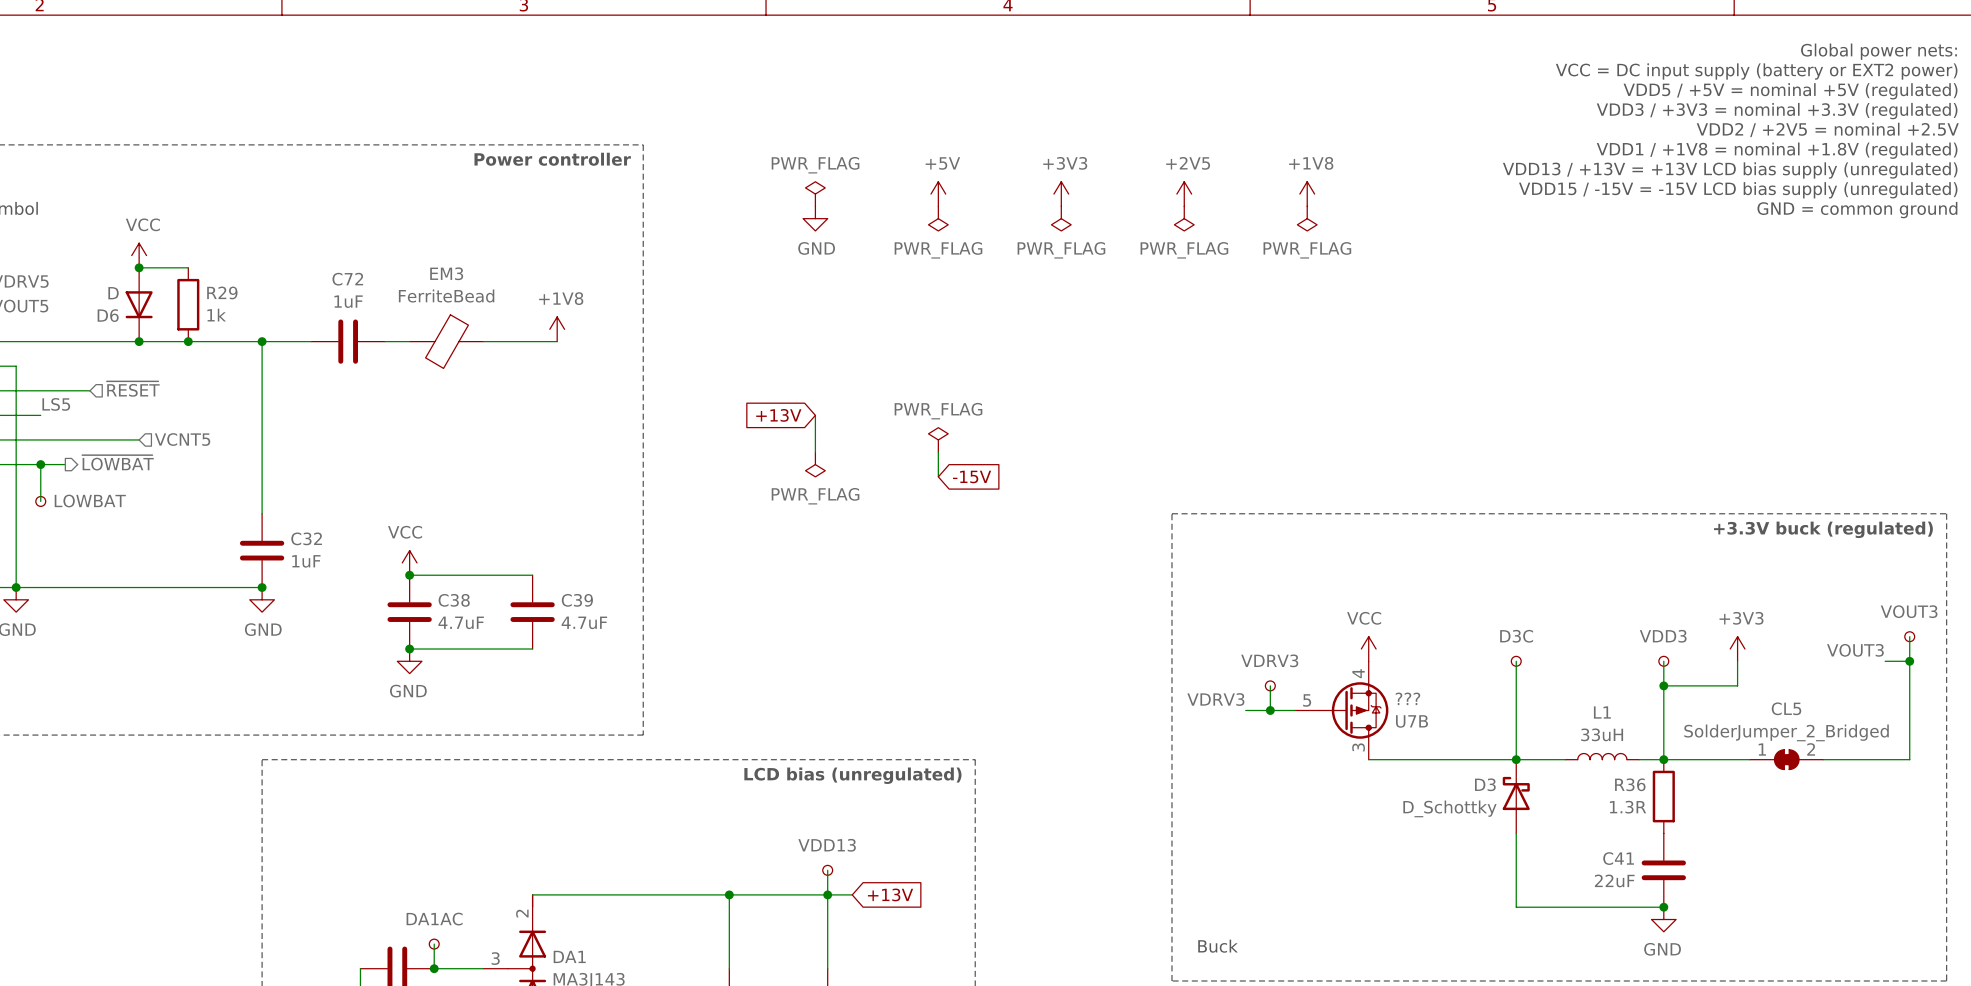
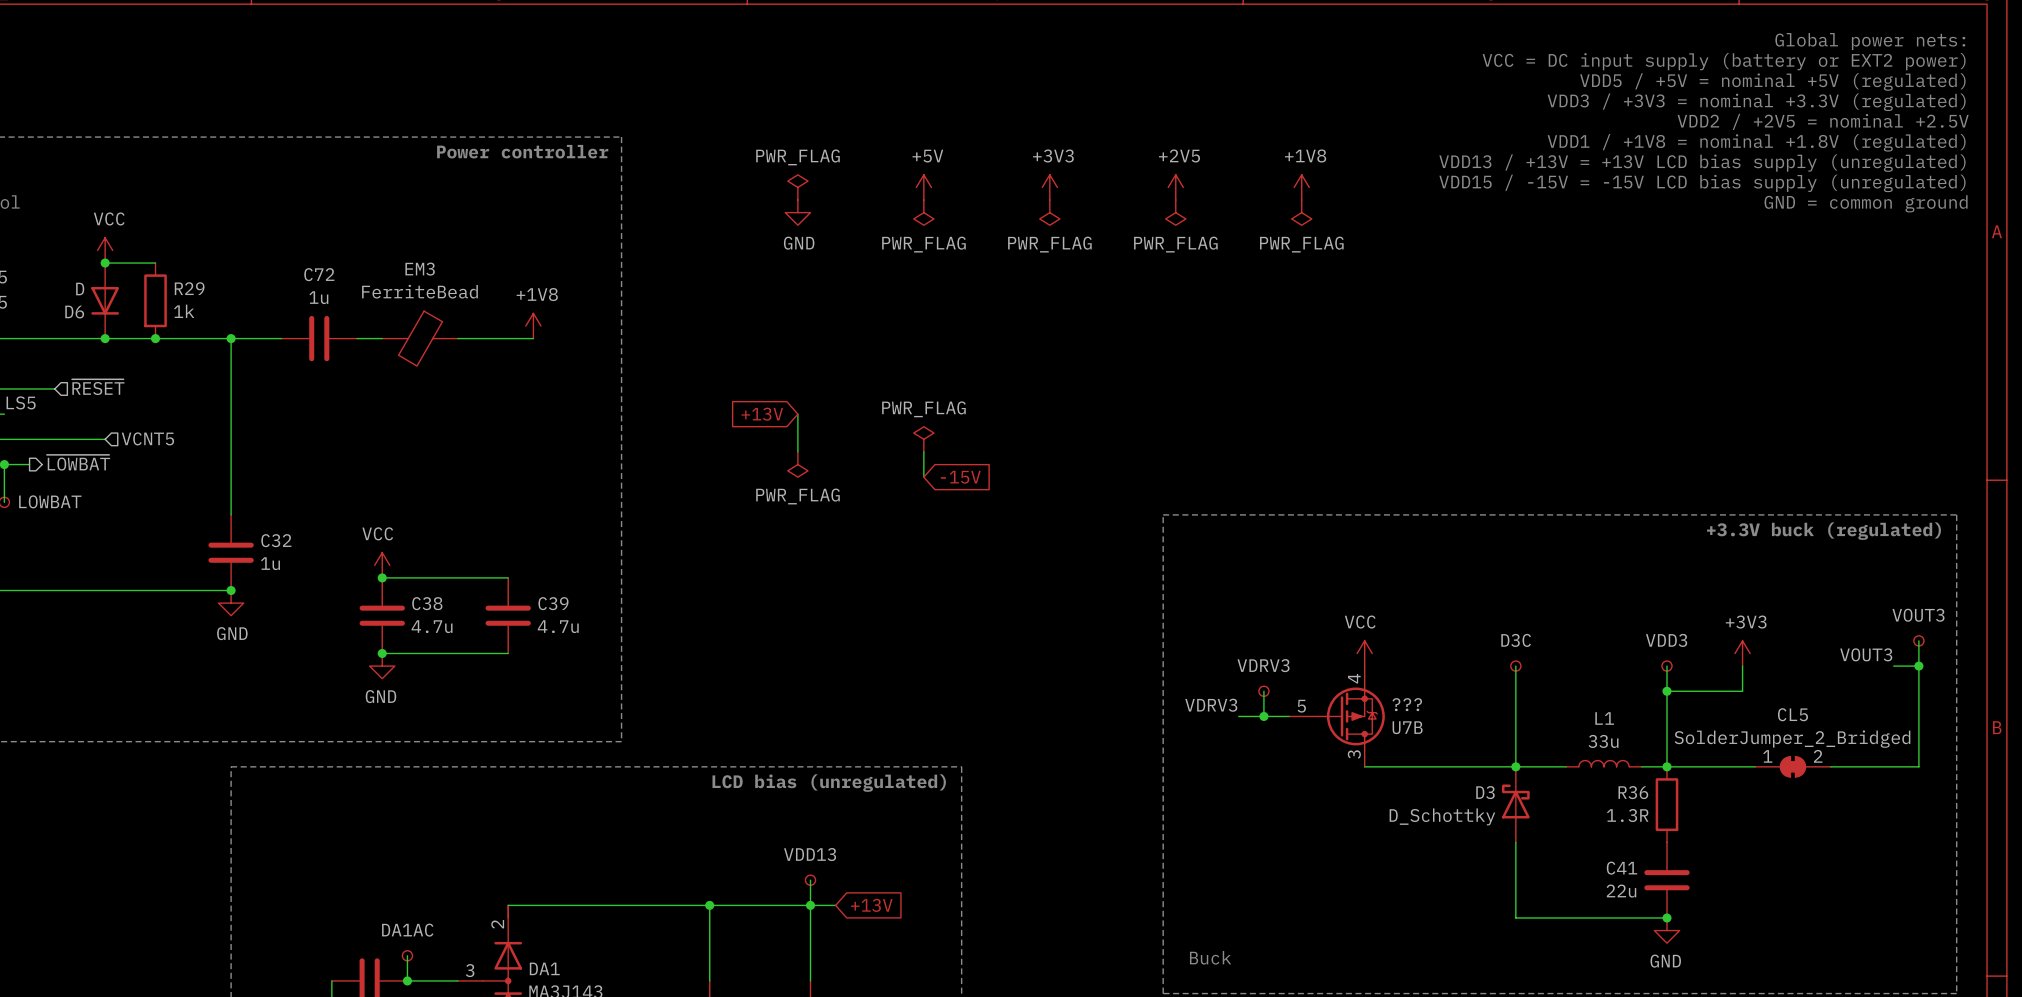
C72 value: 1uF (348, 301) -> 1u (318, 297)
C32 value: 1uF (306, 561) -> 1u (270, 563)
C38 value: 4.7uF (461, 622) -> 4.7u (432, 626)
C39 value: 4.7uF (584, 622) -> 4.7u (558, 626)
L1 value: 33uH (1602, 734) -> 33u (1603, 741)
C41 value: 22uF (1614, 880) -> 22u (1621, 891)

